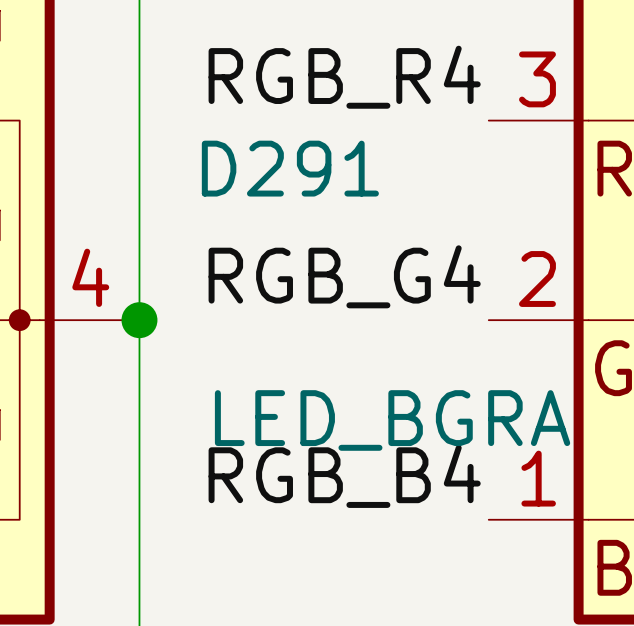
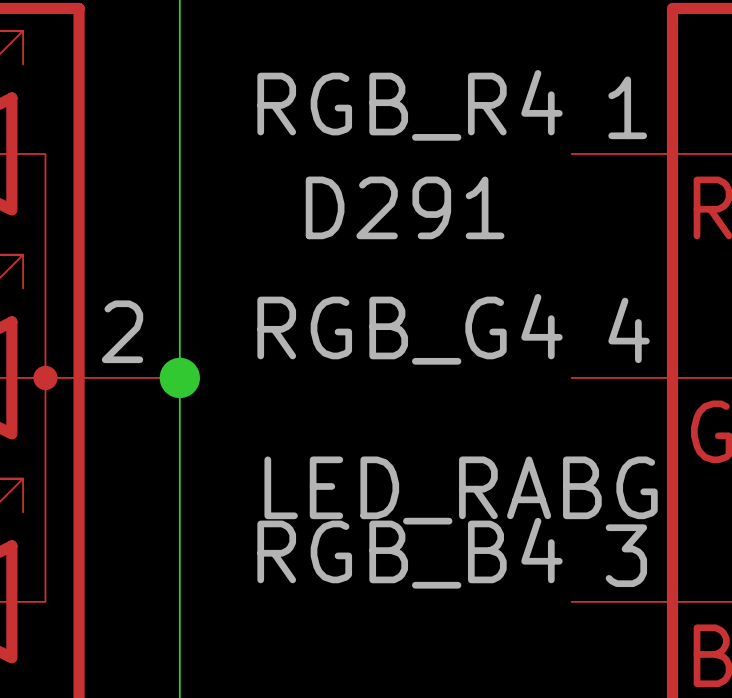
D291 pin number: 3 (537, 79) -> 1 (627, 107)
D291 name position: D291 (290, 168) -> D291 (405, 207)
part pin number: 4 (90, 277) -> 2 (122, 331)
D291 pin number: 2 (537, 279) -> 4 (629, 330)
D291 value: LED_BGRA (392, 420) -> LED_RABG (461, 490)
D291 pin number: 1 (538, 478) -> 3 (626, 555)

